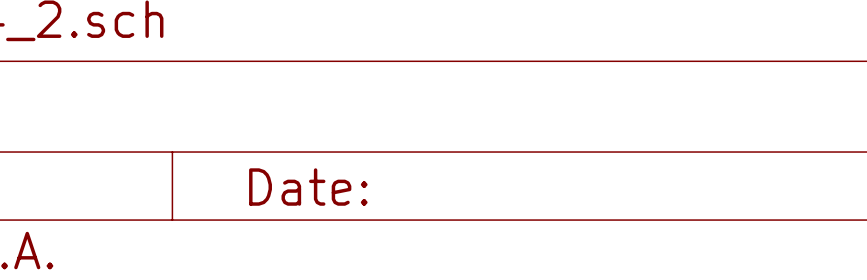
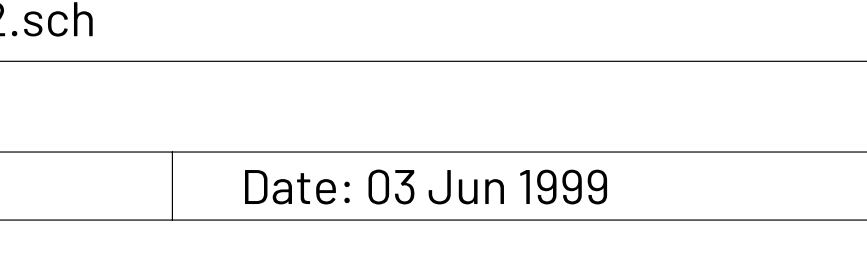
title block: Date: (308, 187) -> Date: 03 Jun 1999 (426, 187)

